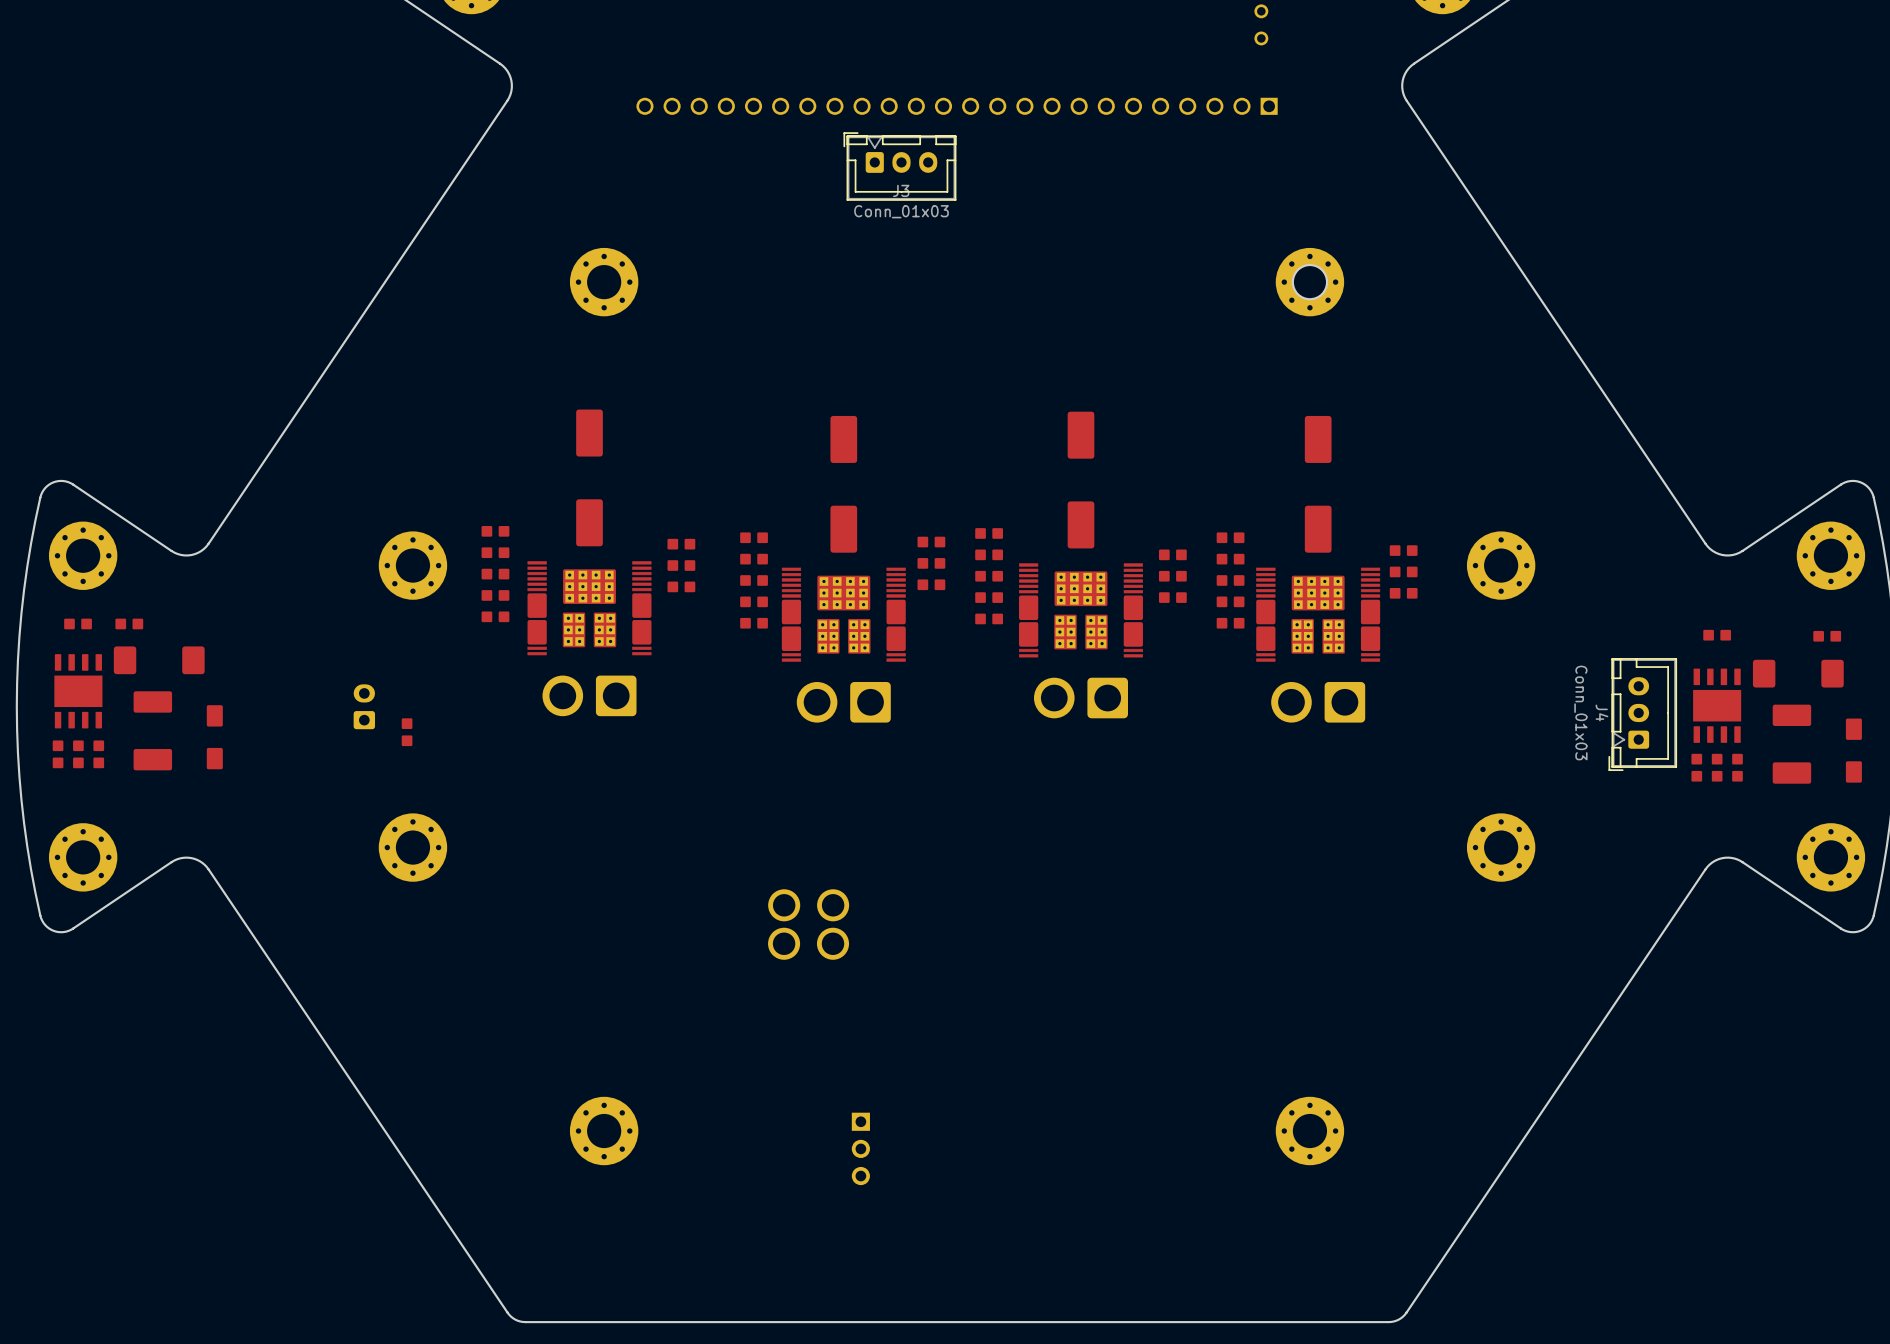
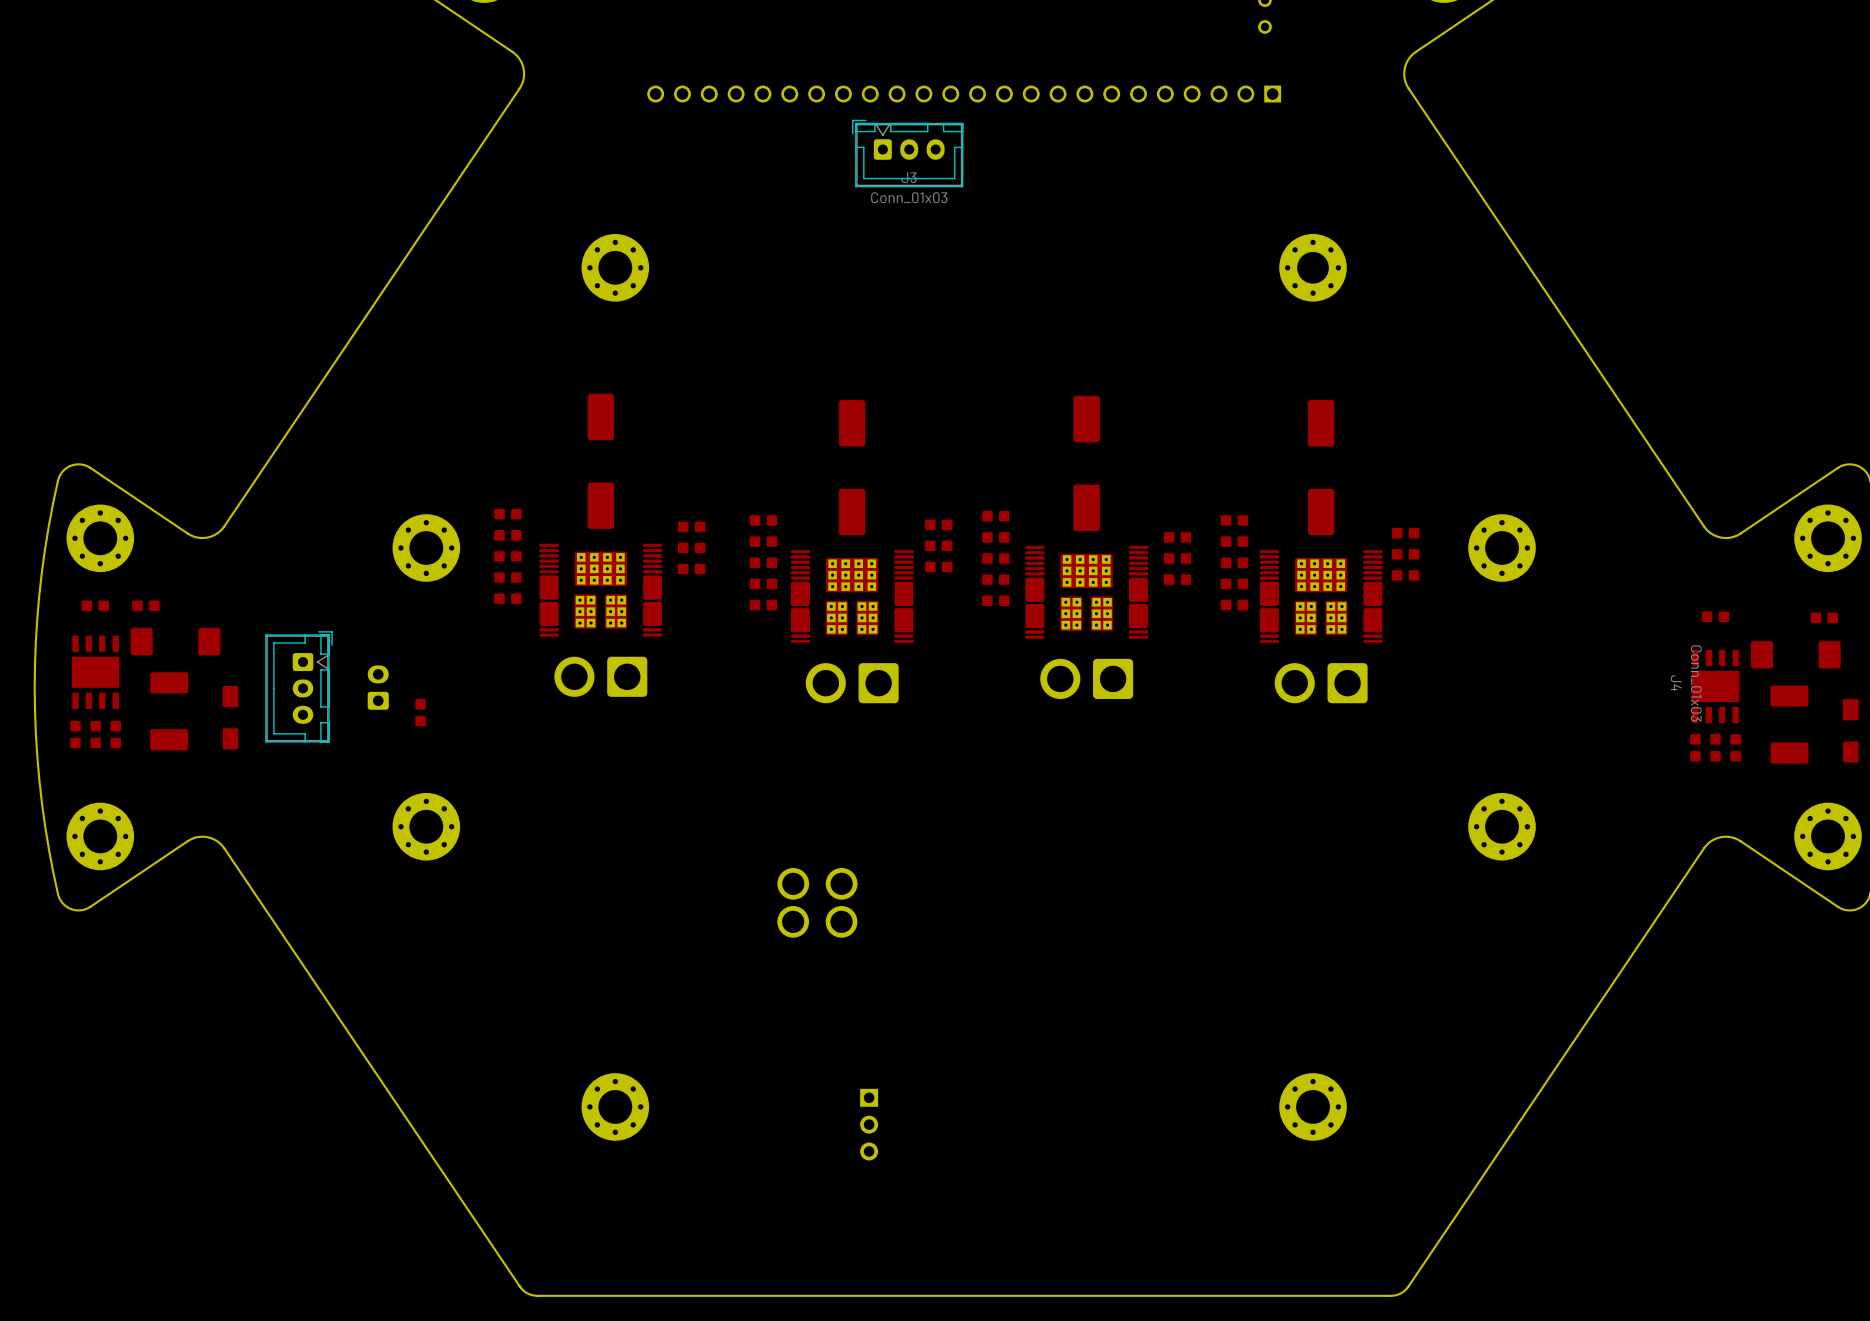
J4 value position: Conn_01x03 (1580, 712) -> Conn_01x03 (1696, 683)
J4 name position: J4 (1601, 712) -> J4 (1676, 683)
J4 rotation: 0° (1642, 714) -> 180° (298, 686)
J4 position: (1642, 714) -> (298, 686)

